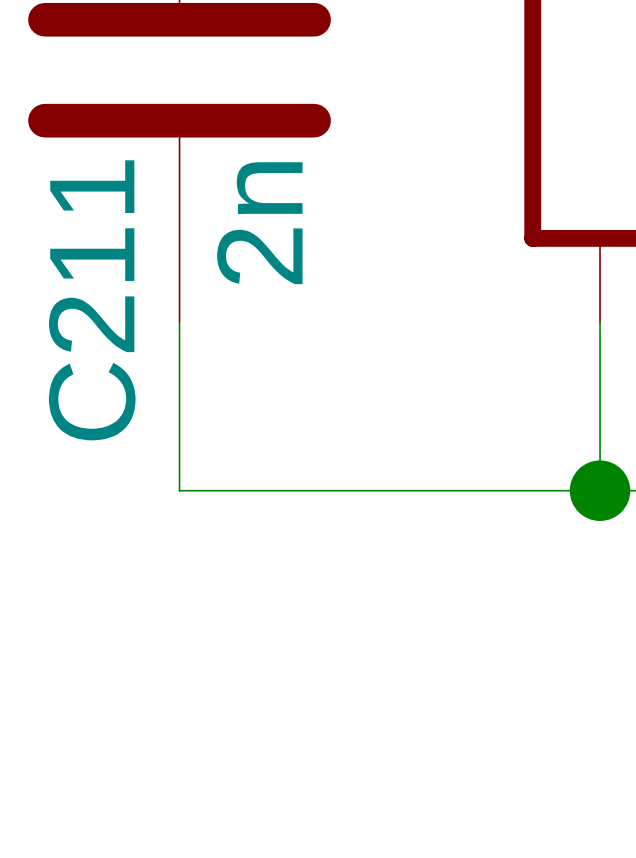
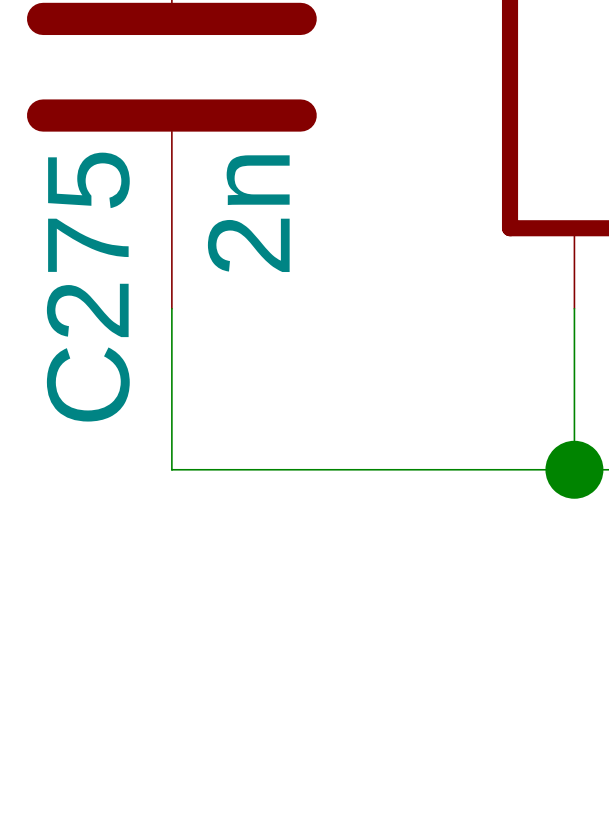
C211 name: C211 (92, 300) -> C275 (88, 287)

